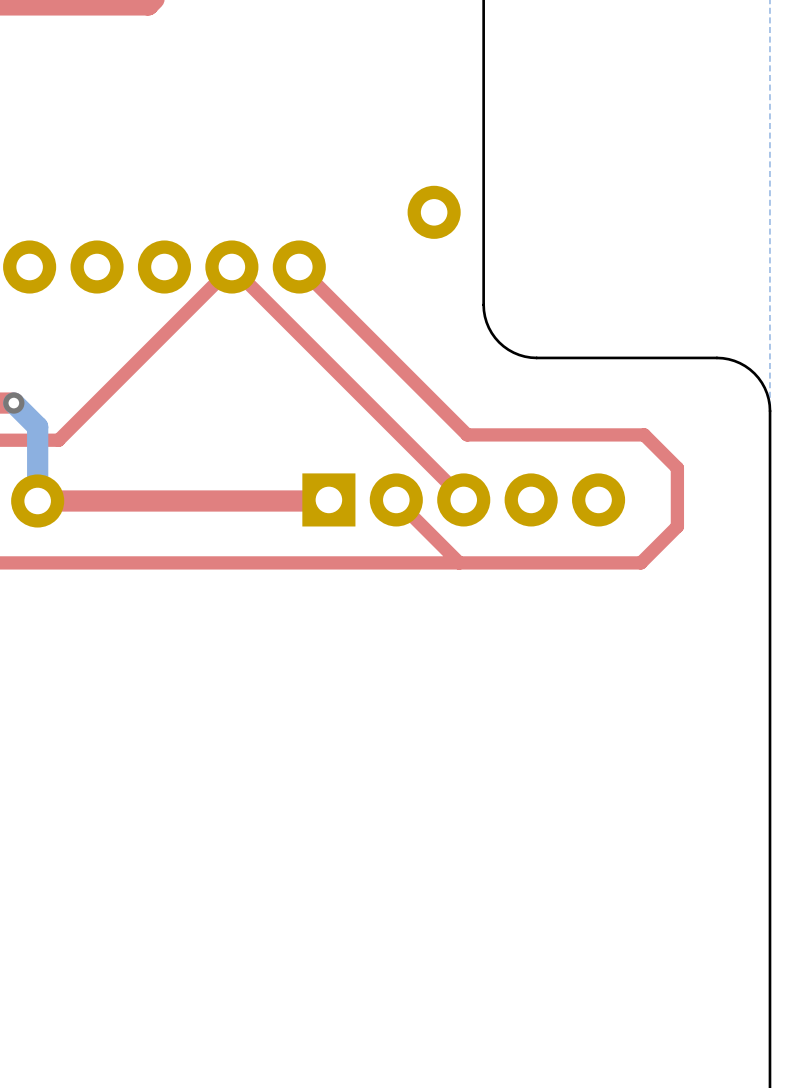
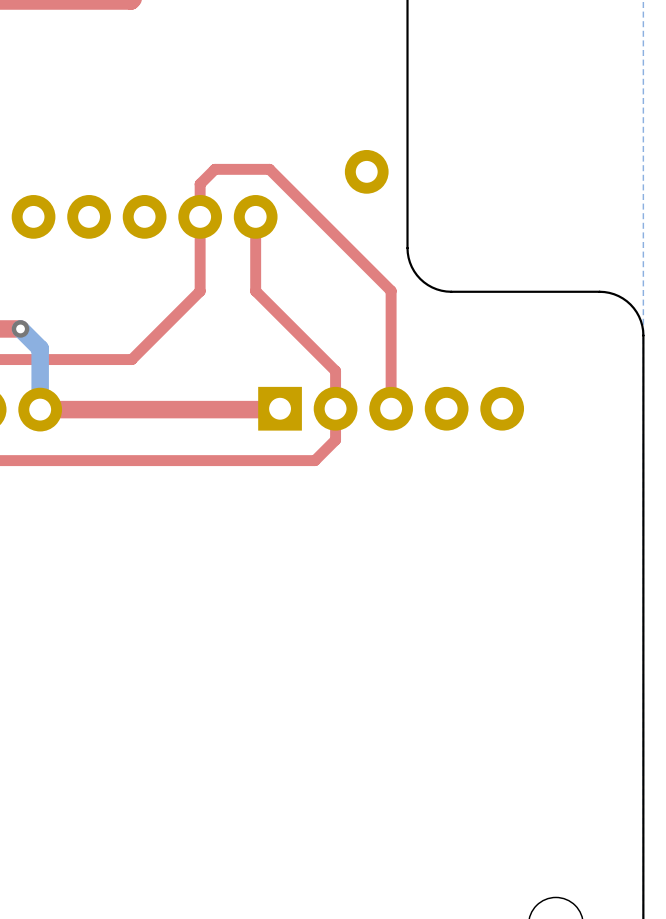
top track: (299, 267) (467, 434) (644, 434) (677, 468) (677, 526) (640, 562) (371, 562) -> (255, 216) (255, 291) (335, 371) (335, 440) (314, 460)
top track: (58, 440) (231, 267) (463, 498) -> (57, 359) (131, 359) (200, 291) (200, 184) (214, 169) (269, 169) (391, 290) (391, 407)
top track: (396, 499) (459, 562) -> none

